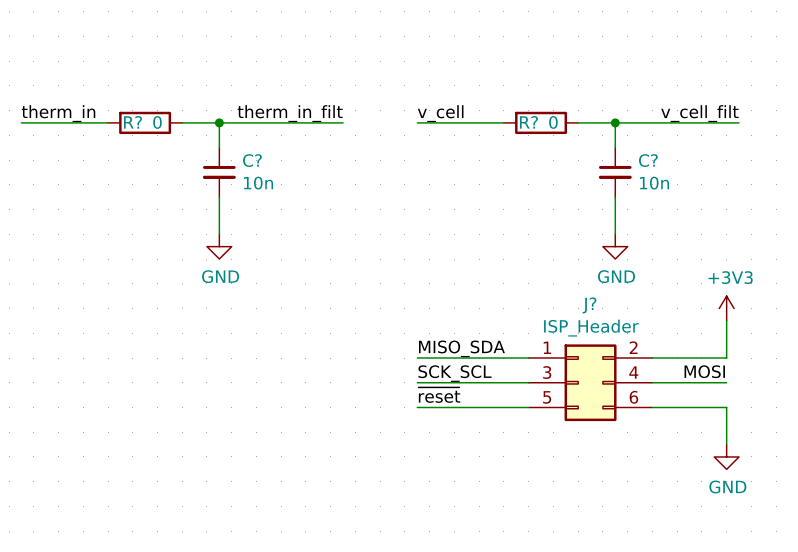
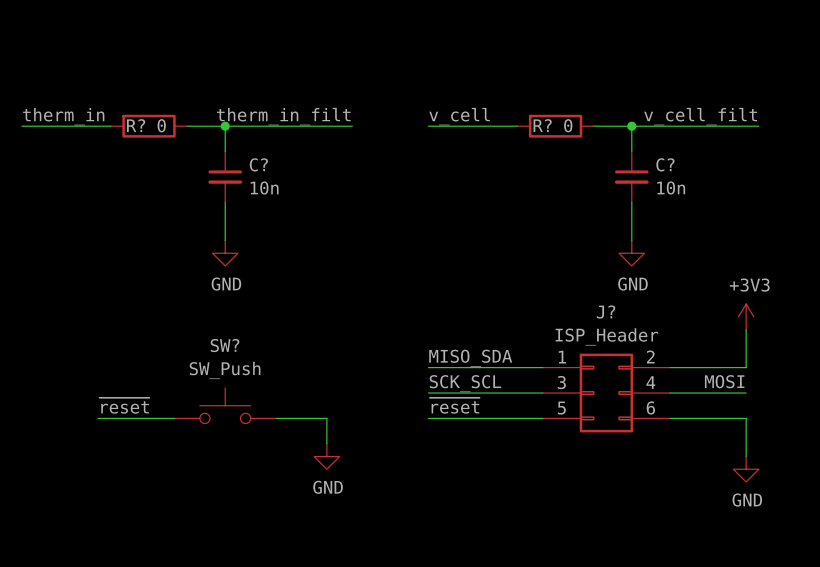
label: none -> ~{reset} (124, 405)
SW?: none -> SW_Push (225, 405)
wire: none -> (98, 418) (174, 418)
wire: none -> (276, 418) (326, 418) (326, 443)
power symbol: none -> GND (326, 456)

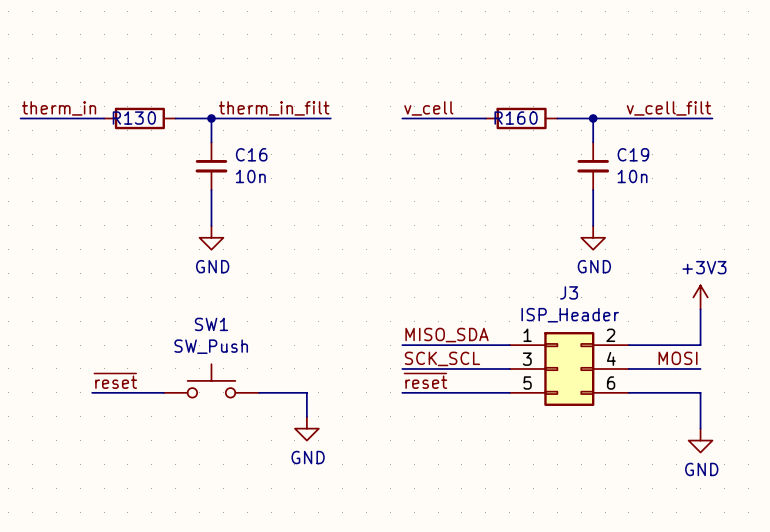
R? name: R? (136, 125) -> R13 (128, 118)
R? name: R? (542, 125) -> R16 (509, 118)
C? name: C? (258, 164) -> C16 (251, 154)
C? name: C? (665, 164) -> C19 (633, 154)
J? name: J? (606, 311) -> J3 (569, 292)
SW? name: SW? (225, 345) -> SW1 (211, 324)

